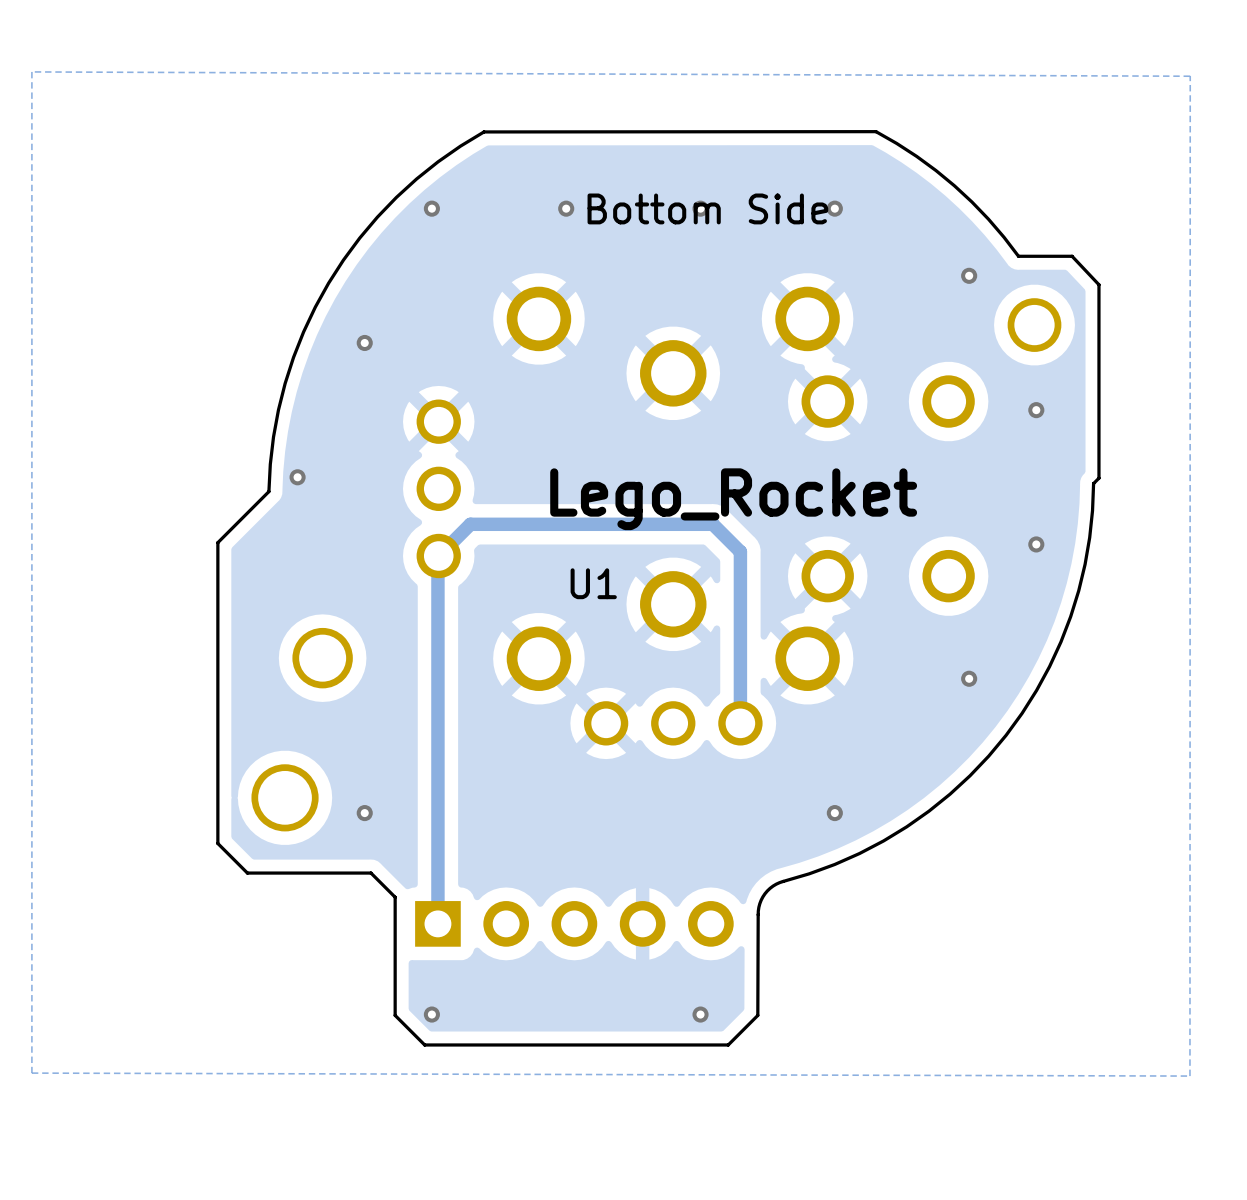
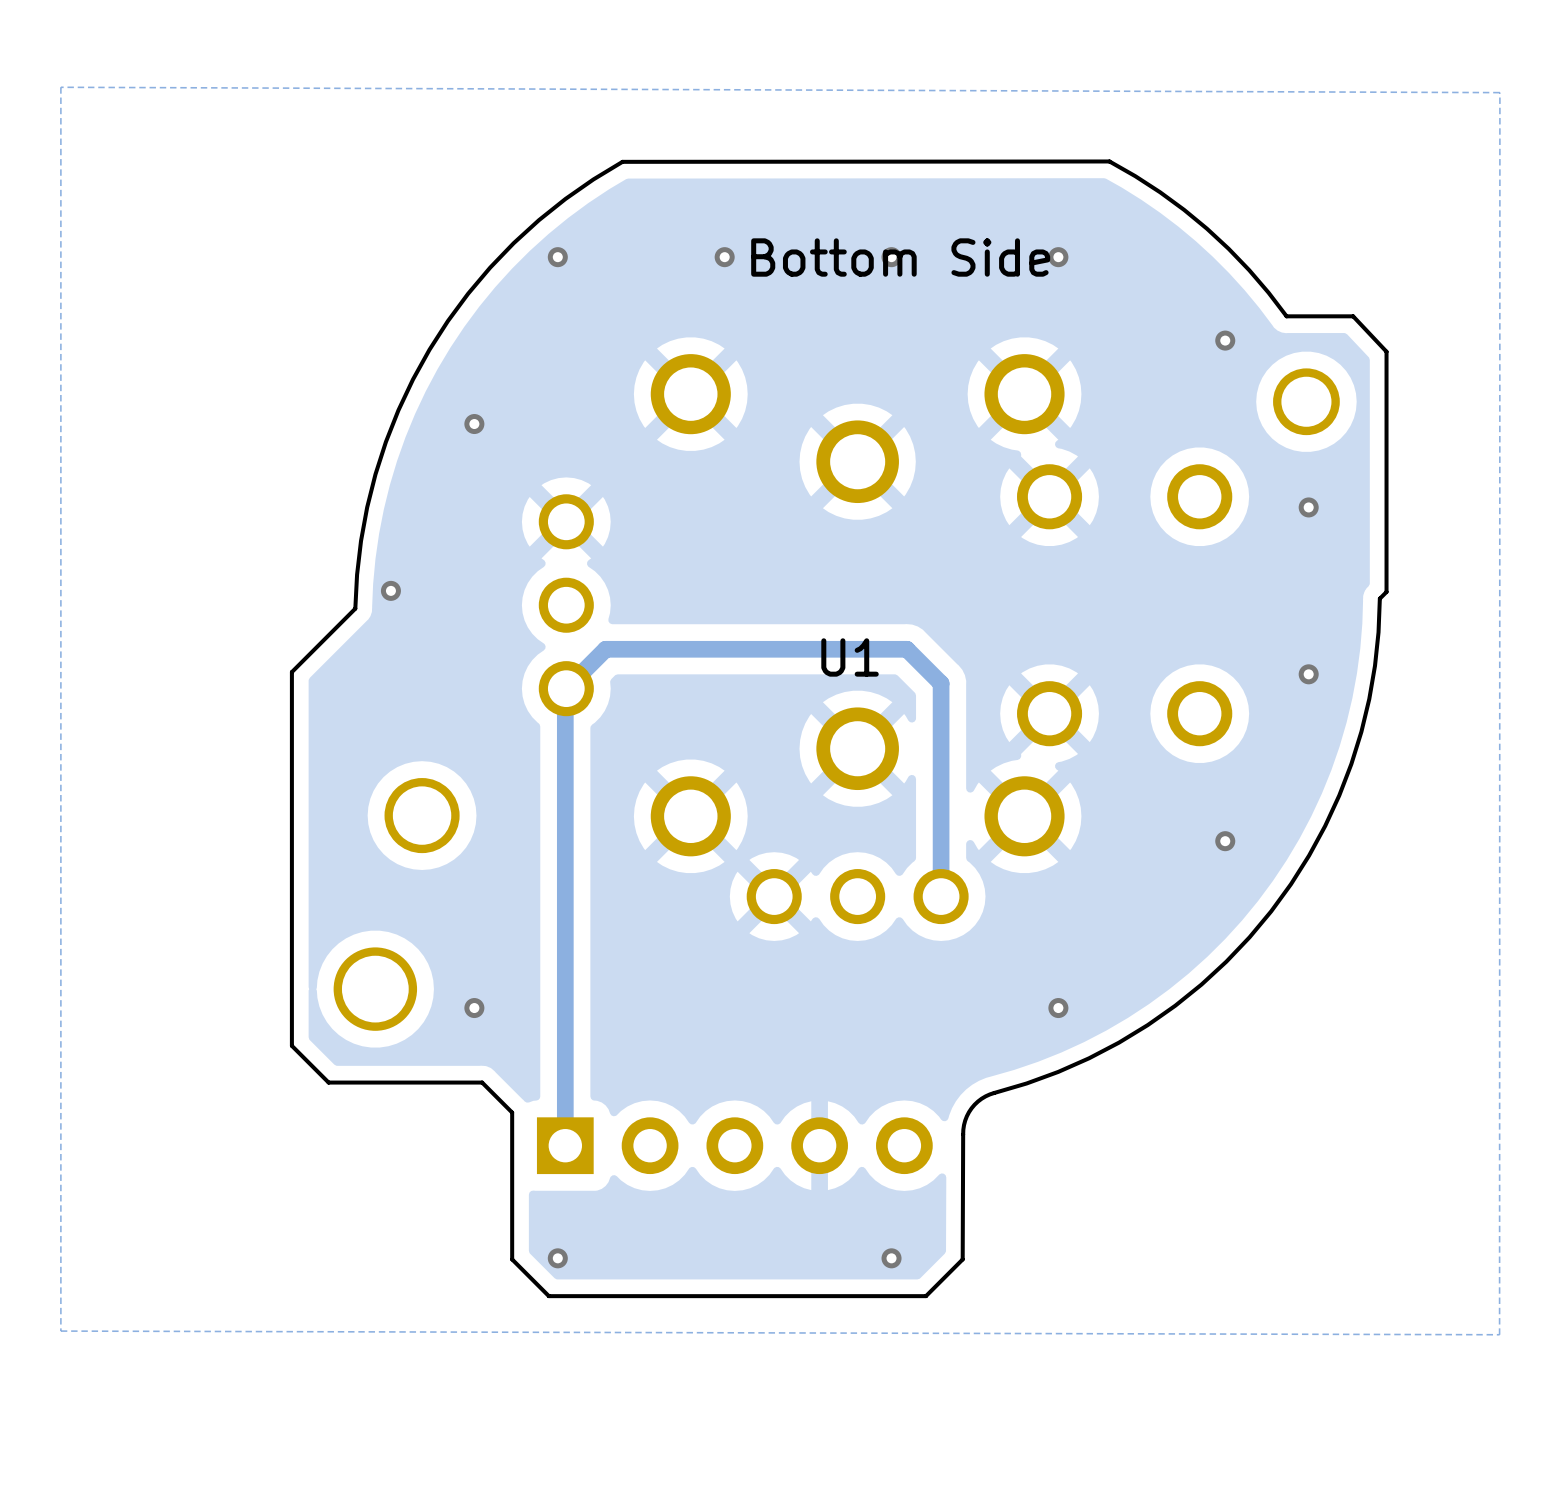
text: Lego_Rocket (733, 499) -> none
U1 name position: U1 (593, 583) -> U1 (850, 657)

